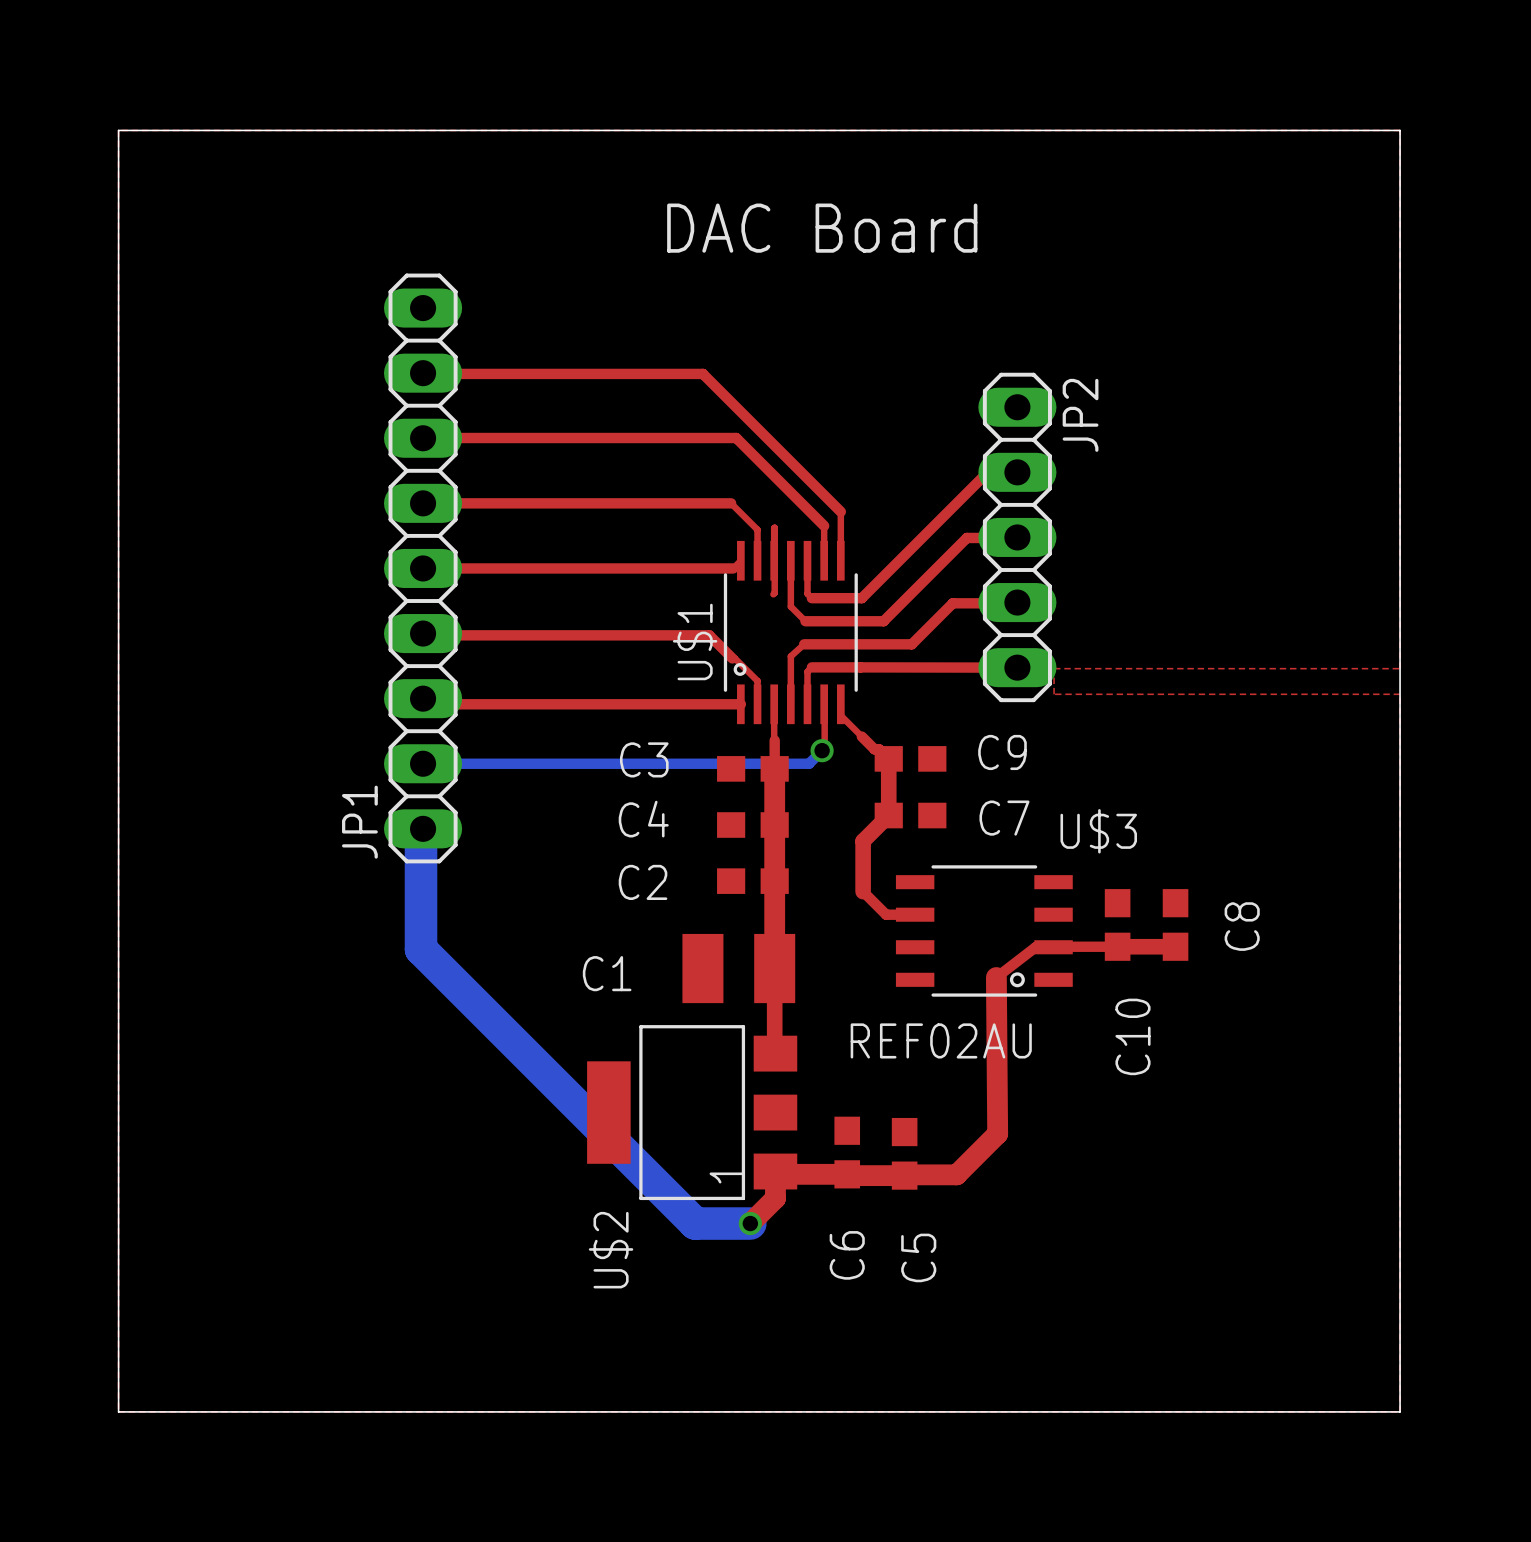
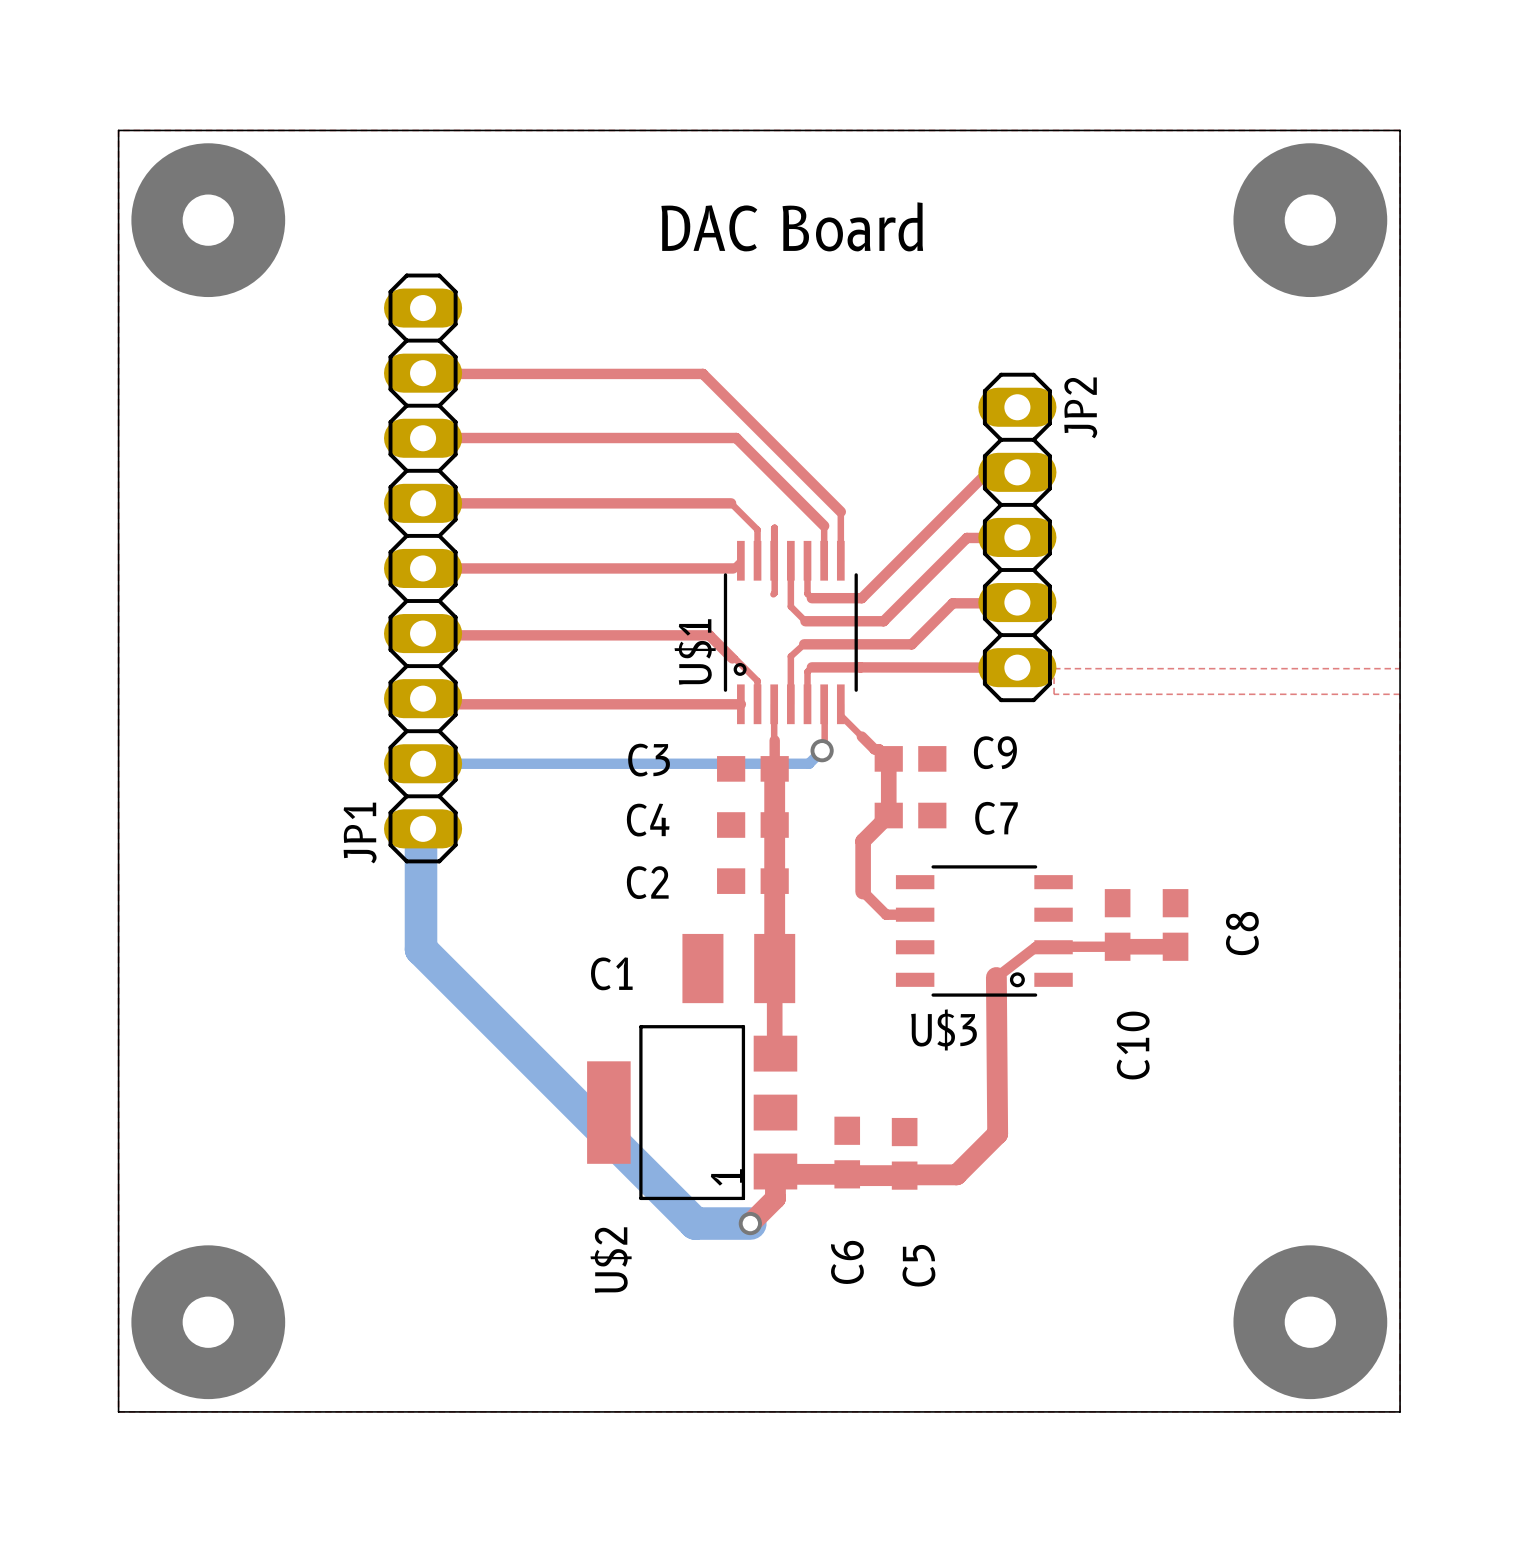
via: none -> (208, 220)
via: none -> (1310, 220)
U$3 name position: U$3 (1098, 831) -> U$3 (944, 1029)
U$3 value: REF02AU (941, 1040) -> none
via: none -> (208, 1322)
via: none -> (1310, 1322)

